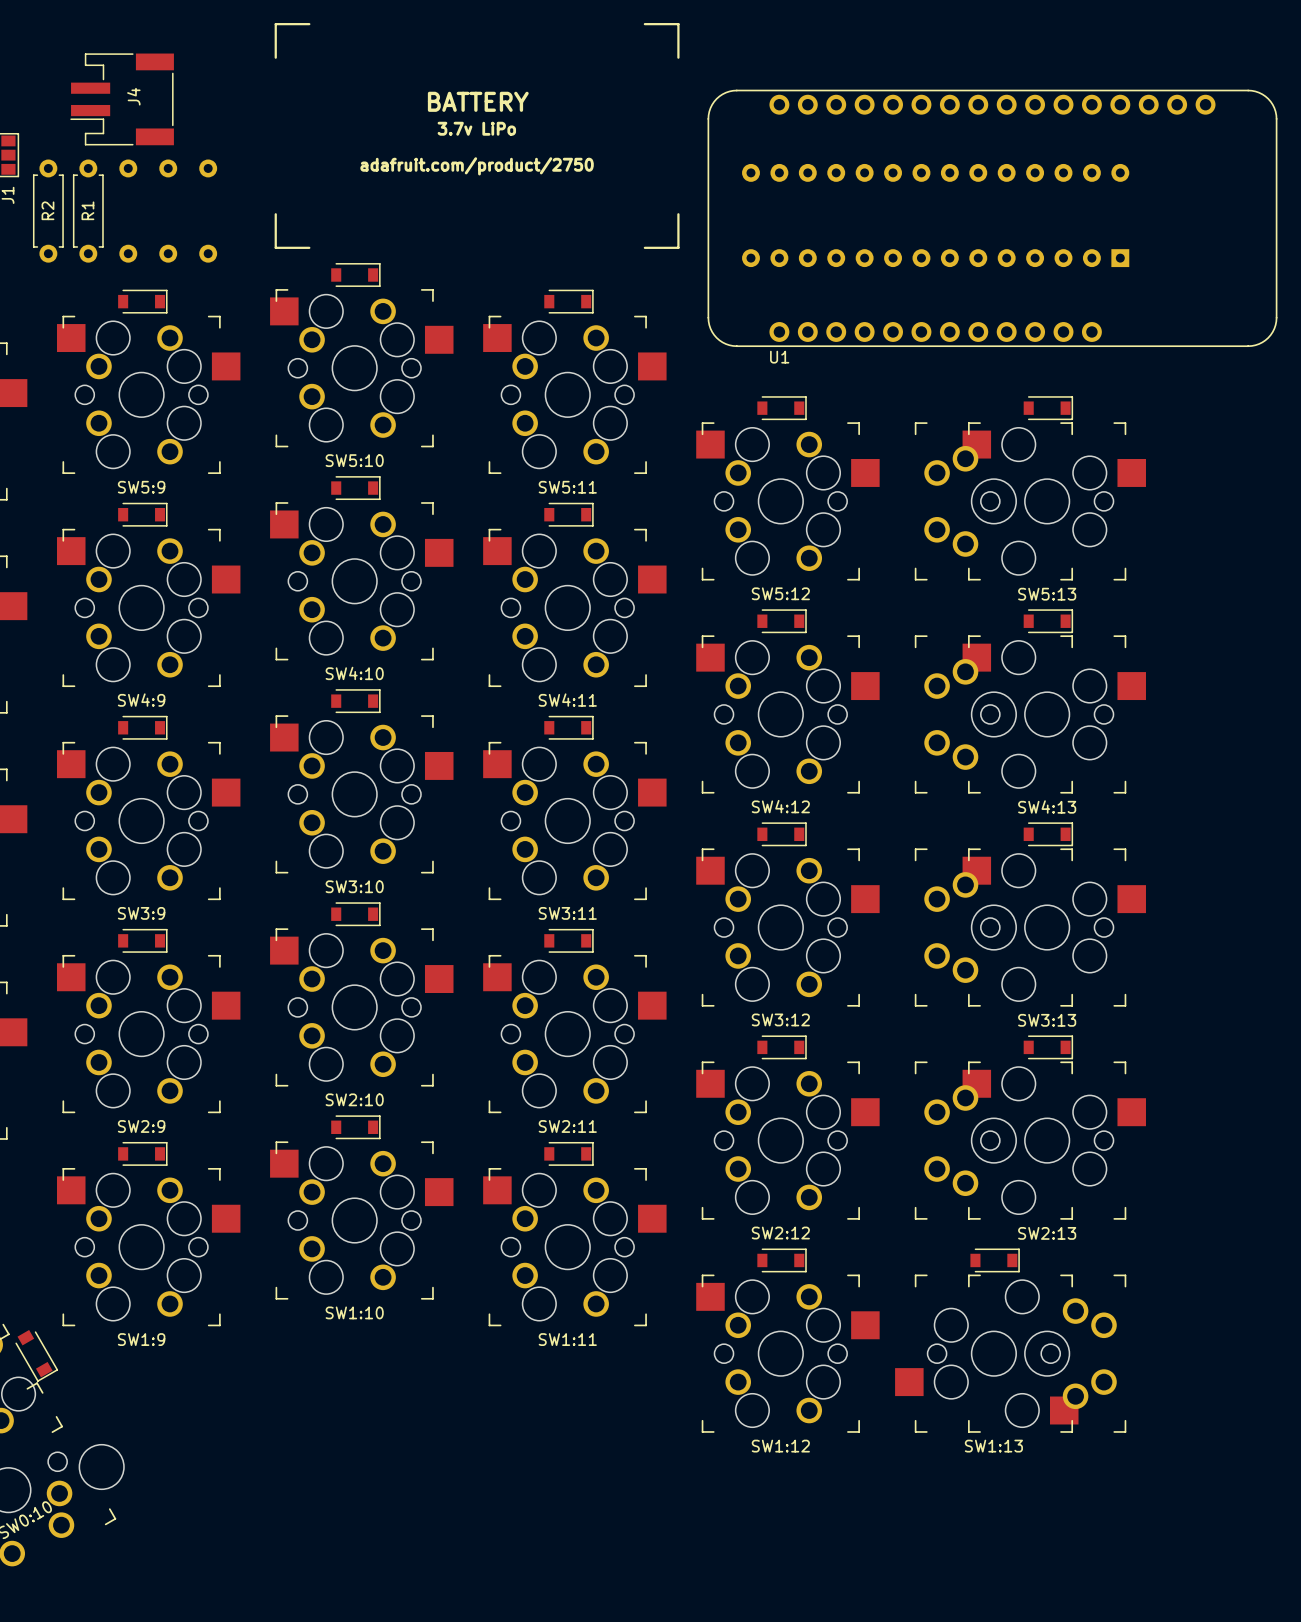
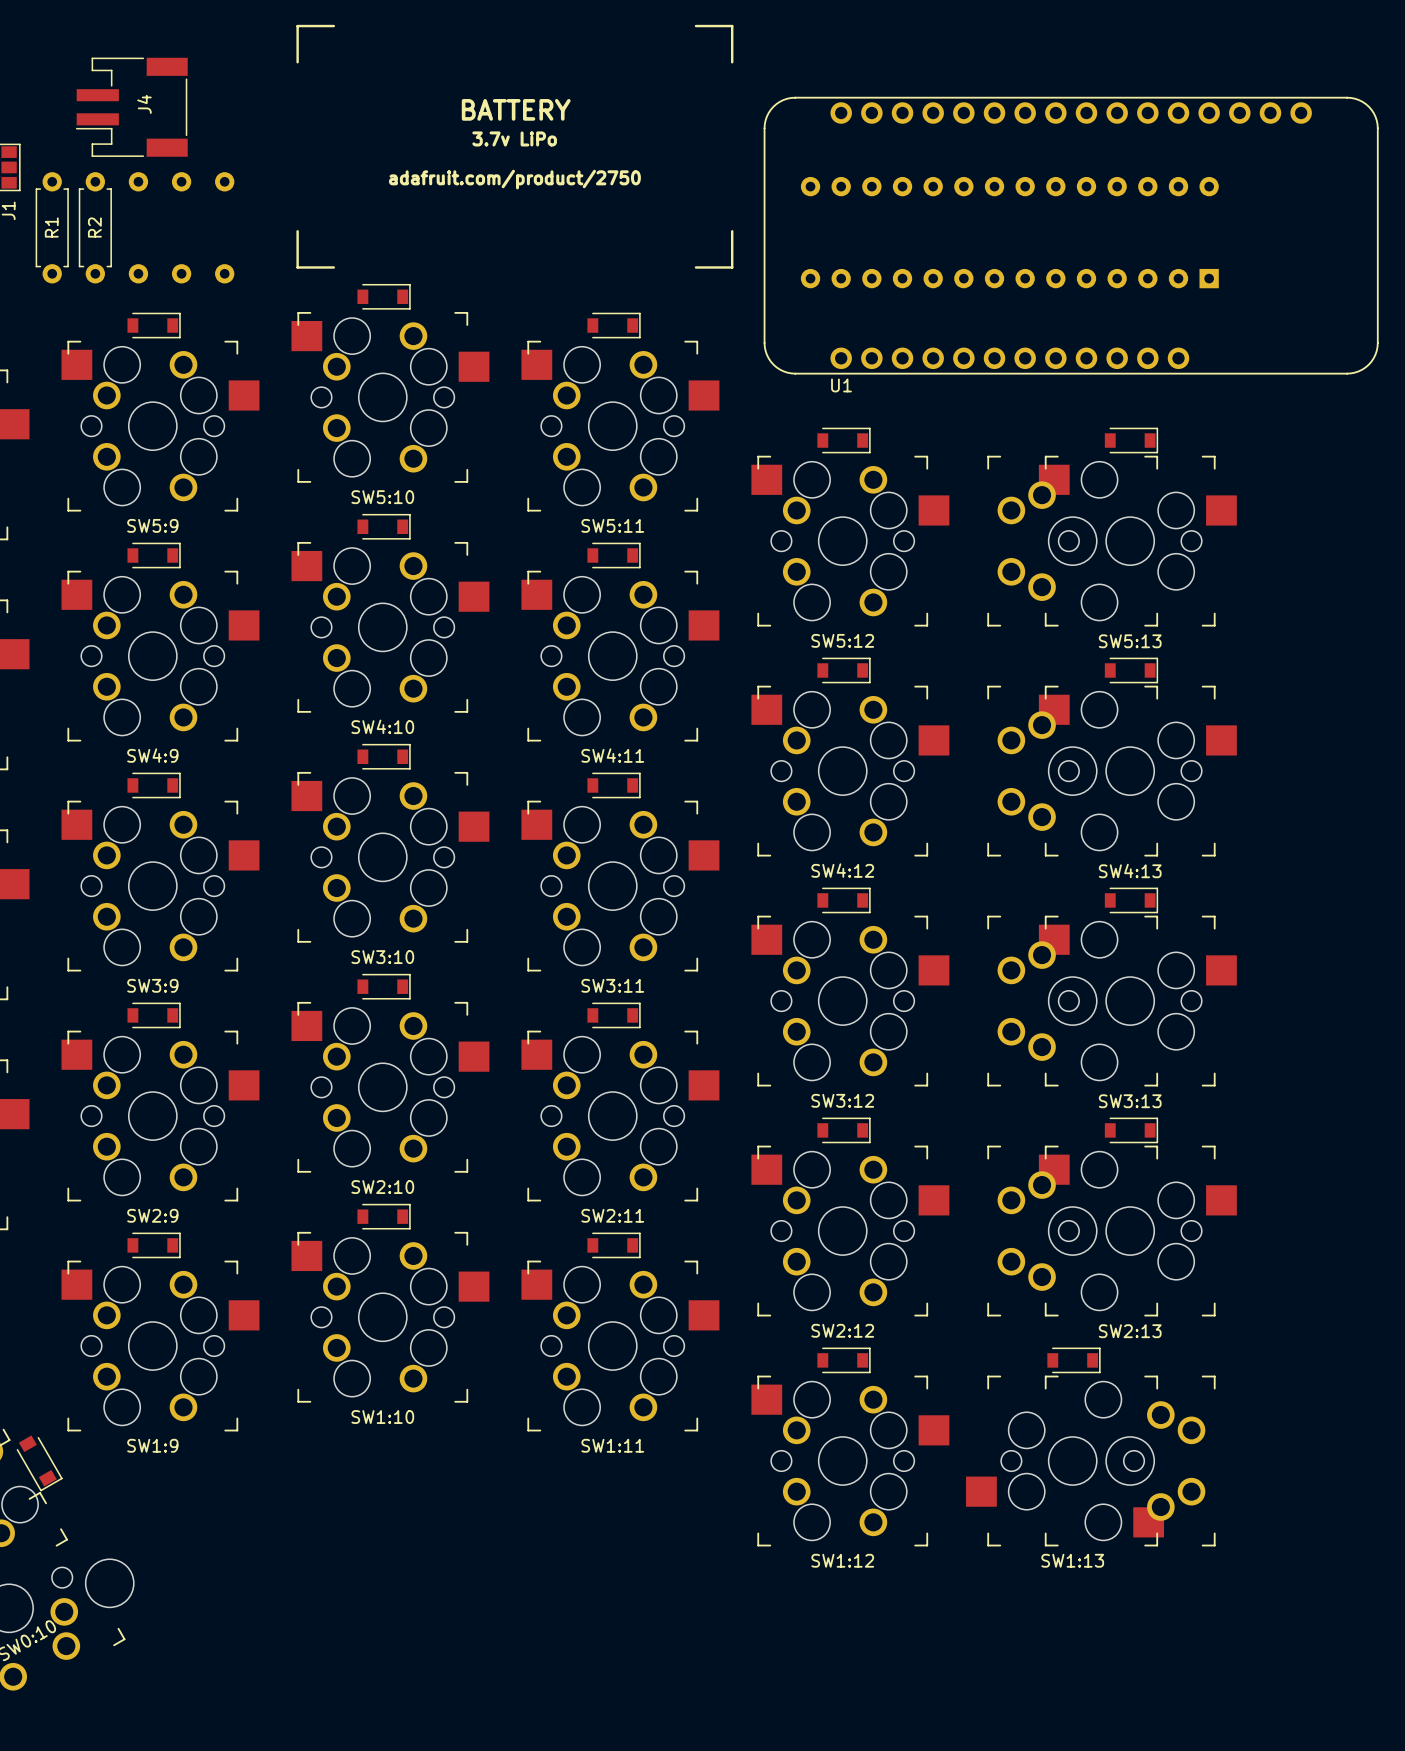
R2 name: R2 (47, 210) -> R1 (51, 227)
R1 name: R1 (87, 210) -> R2 (94, 227)

